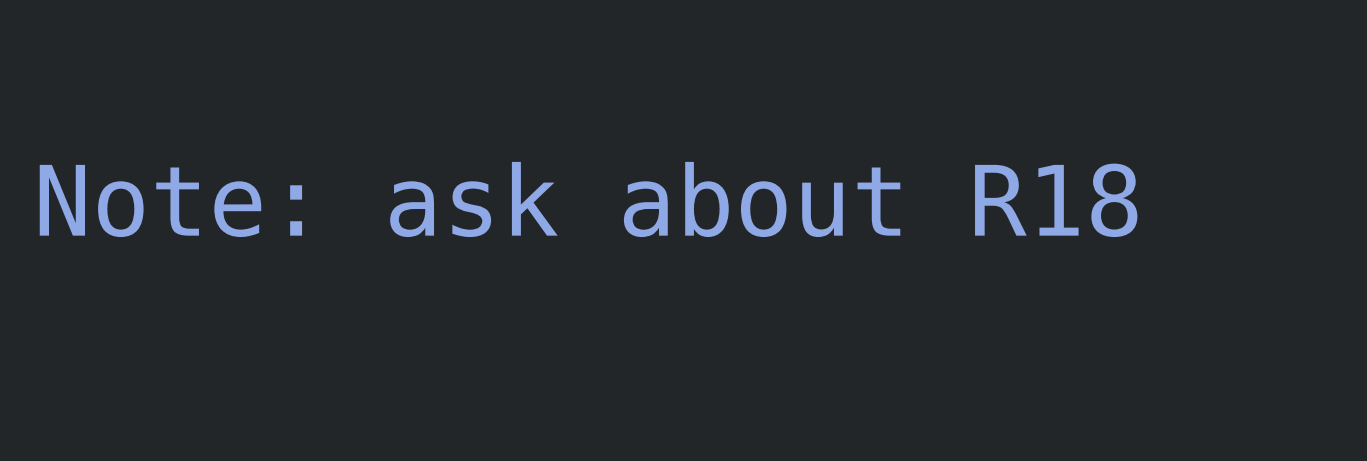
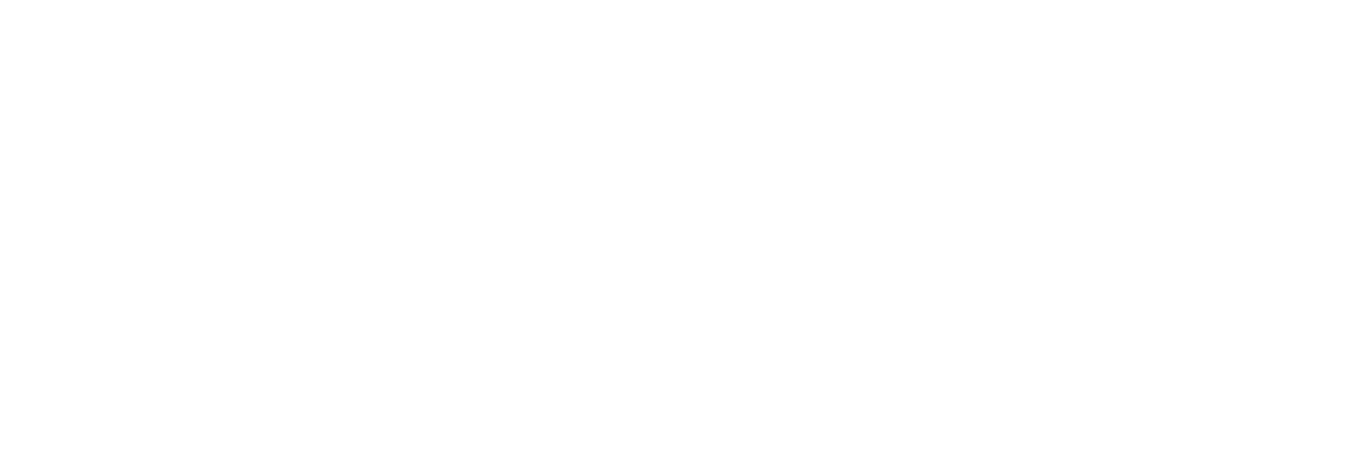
text: Note: ask about R18 (588, 199) -> none

